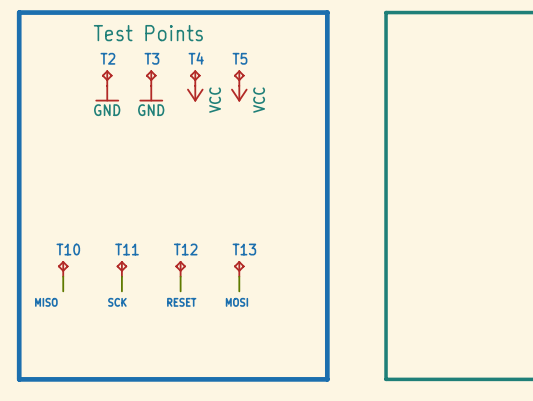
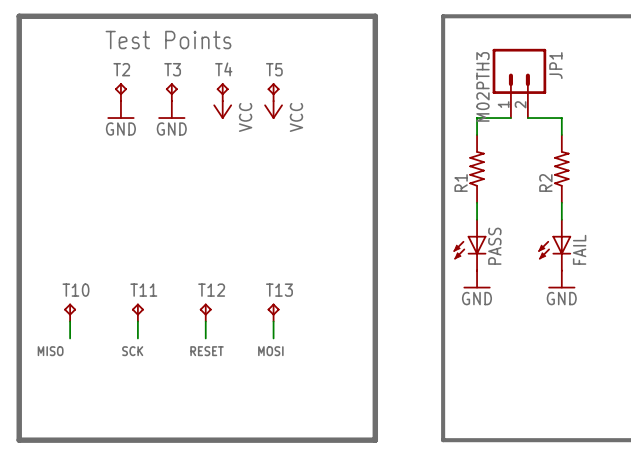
JP1: none -> M02PTH3 (519, 83)
wire: none -> (510, 118) (477, 118) (477, 134)
wire: none -> (527, 118) (561, 118) (561, 134)
R1: none -> (477, 168)
R2: none -> (561, 168)
wire: none -> (477, 202) (477, 219)
wire: none -> (561, 202) (561, 219)
PASS: none -> (470, 245)
FAIL: none -> (554, 245)
power symbol: none -> GND (477, 279)
power symbol: none -> GND (561, 279)

